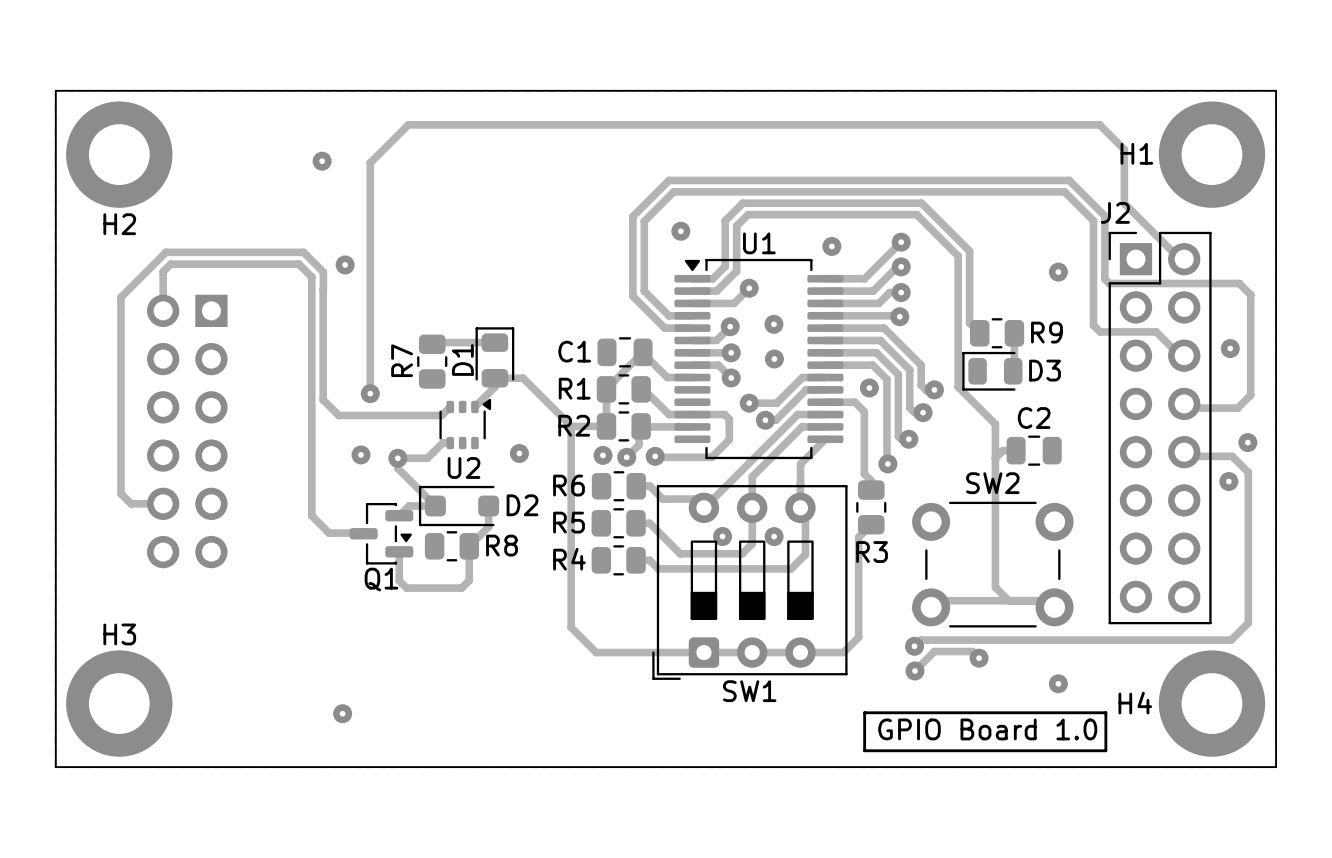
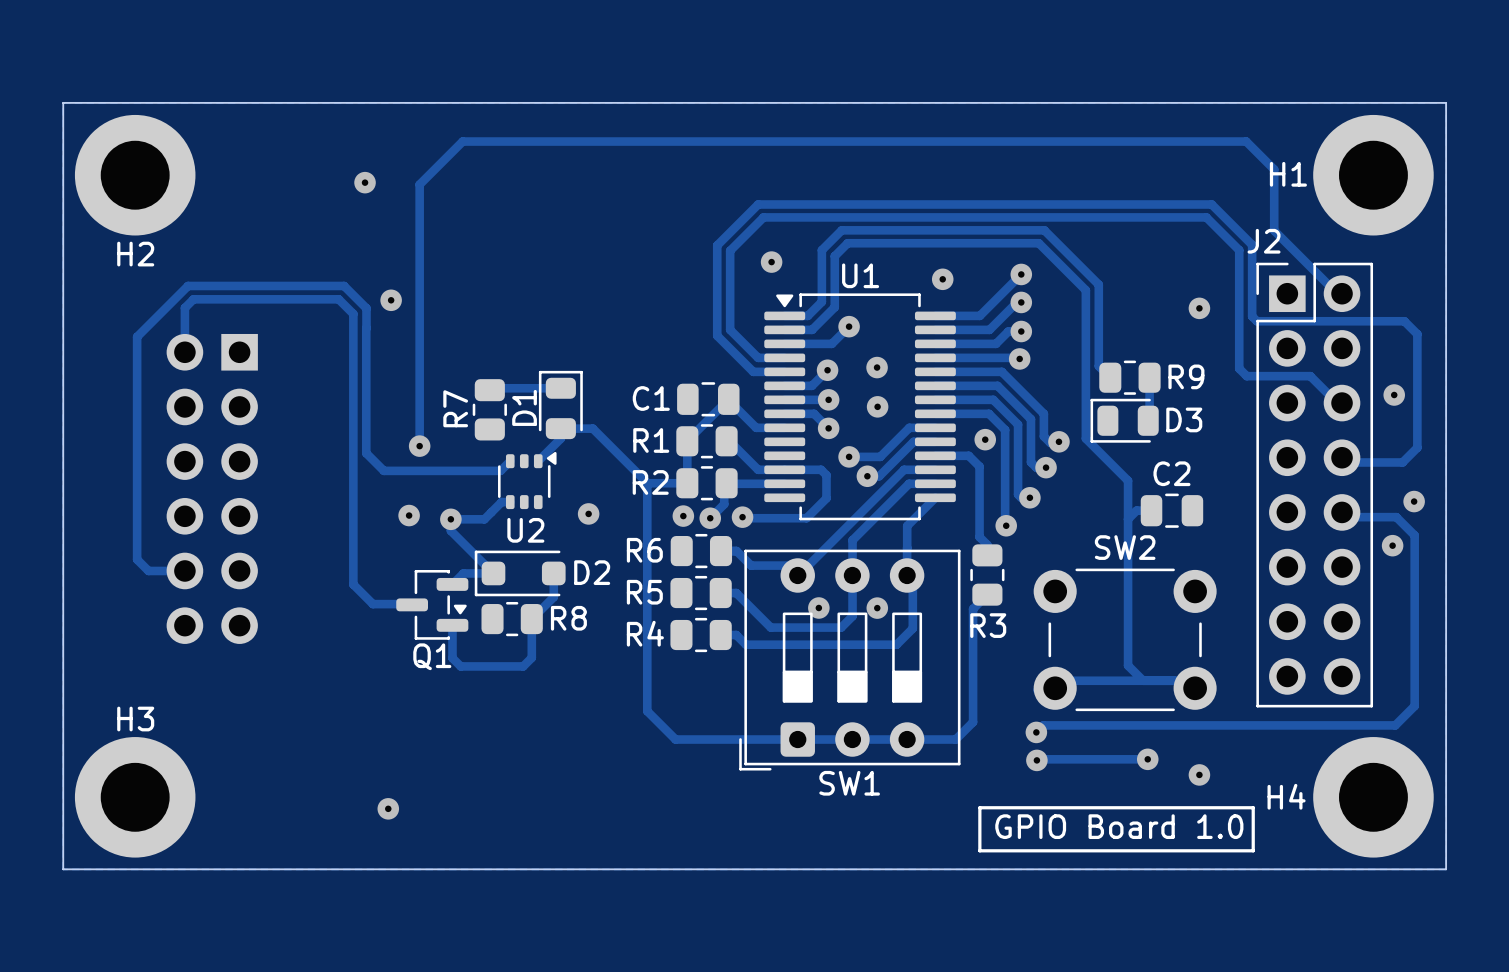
track: (979, 658) (972, 651) (934, 651) (915, 670) -> (1147, 759) (1037, 759)
via position: (979, 658) -> (1147, 759)

